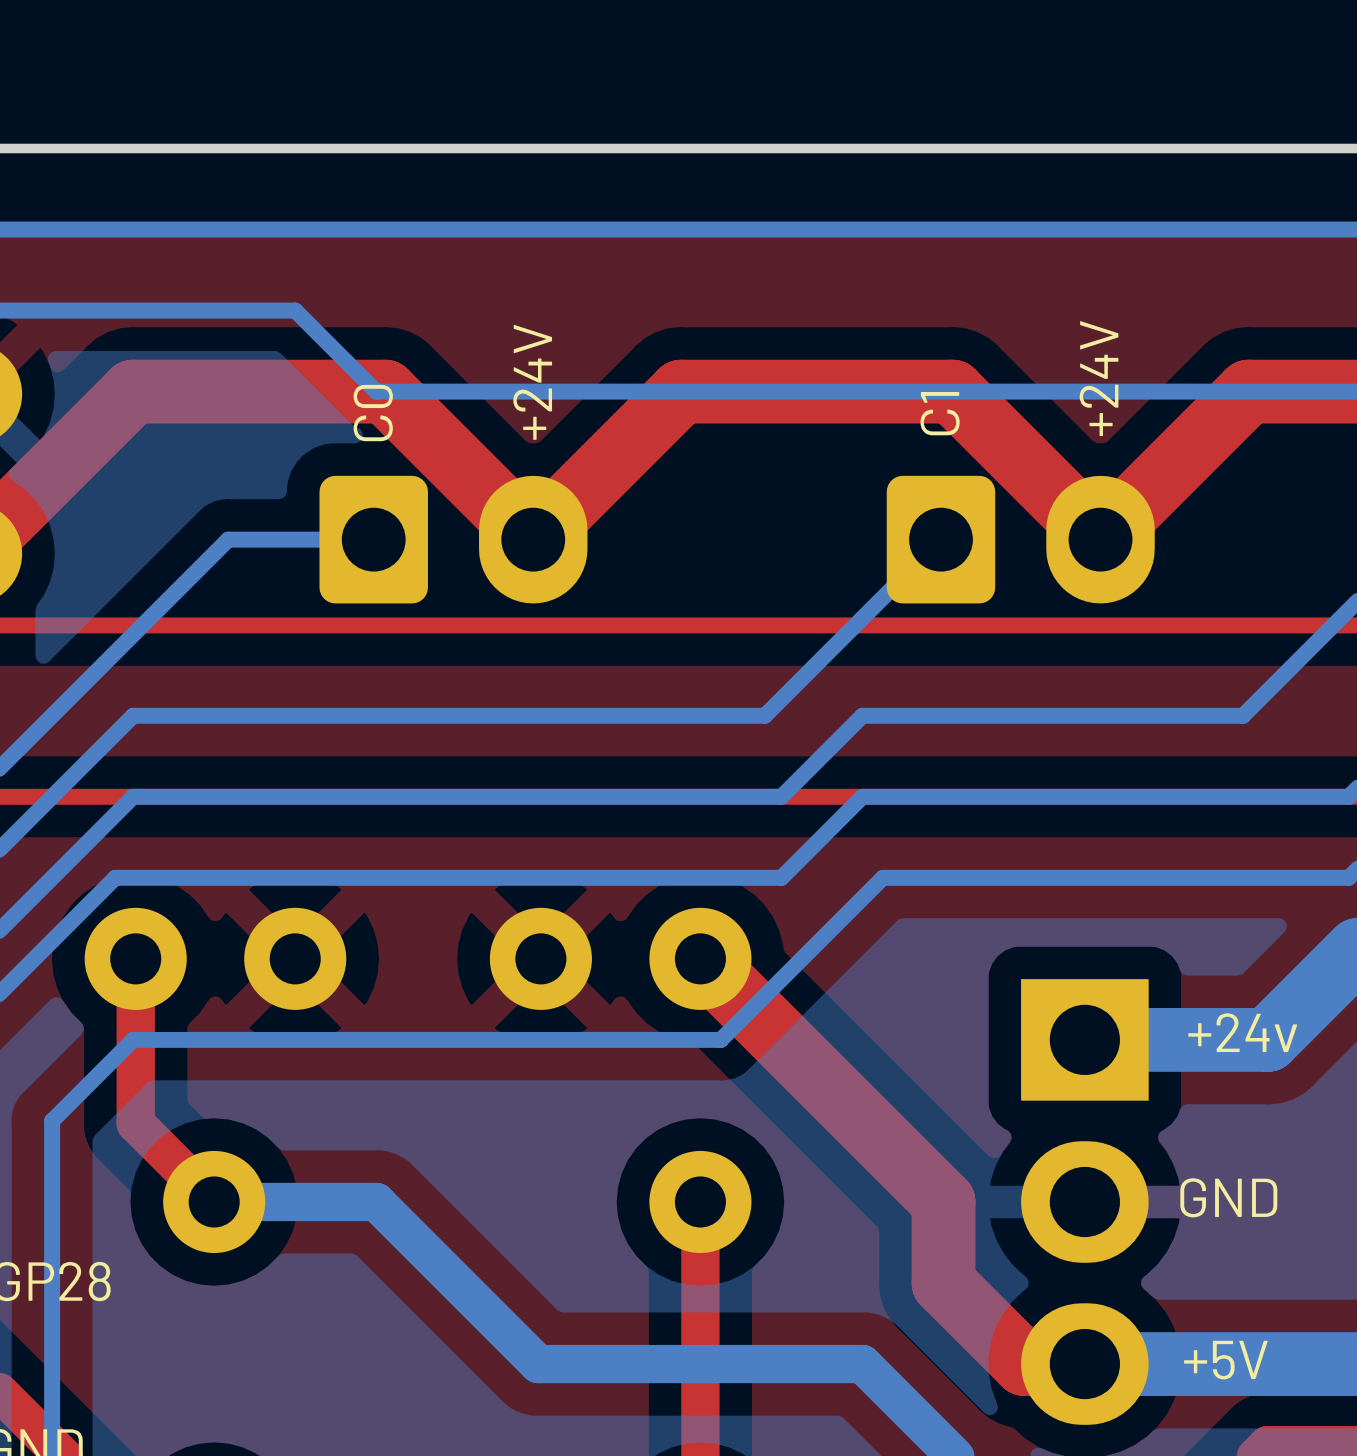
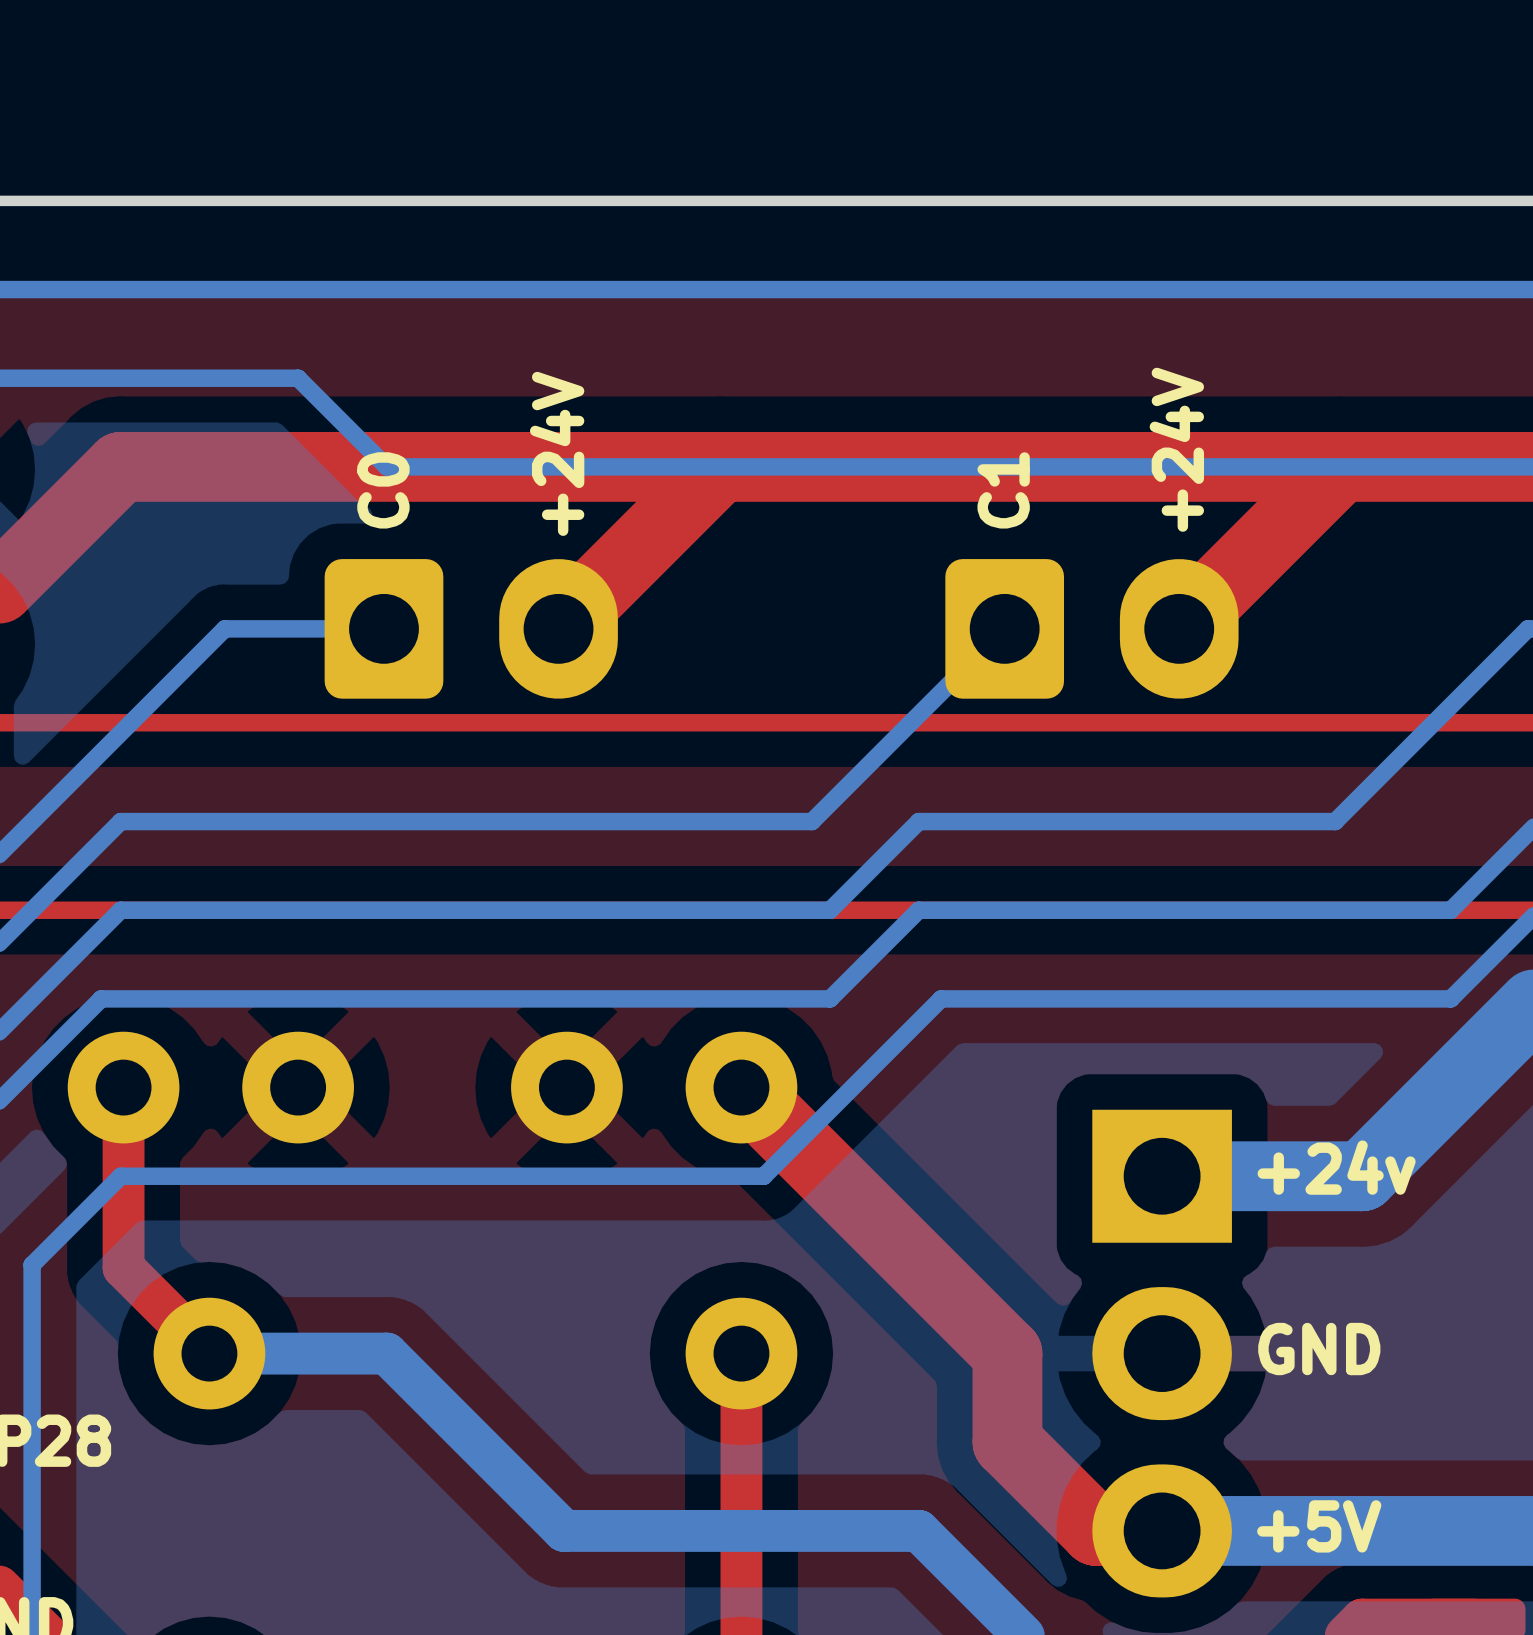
top track: (385, 391) (533, 539) -> (396, 466) (720, 466)
top track: (952, 391) (1100, 539) -> (1017, 466) (1341, 466)

